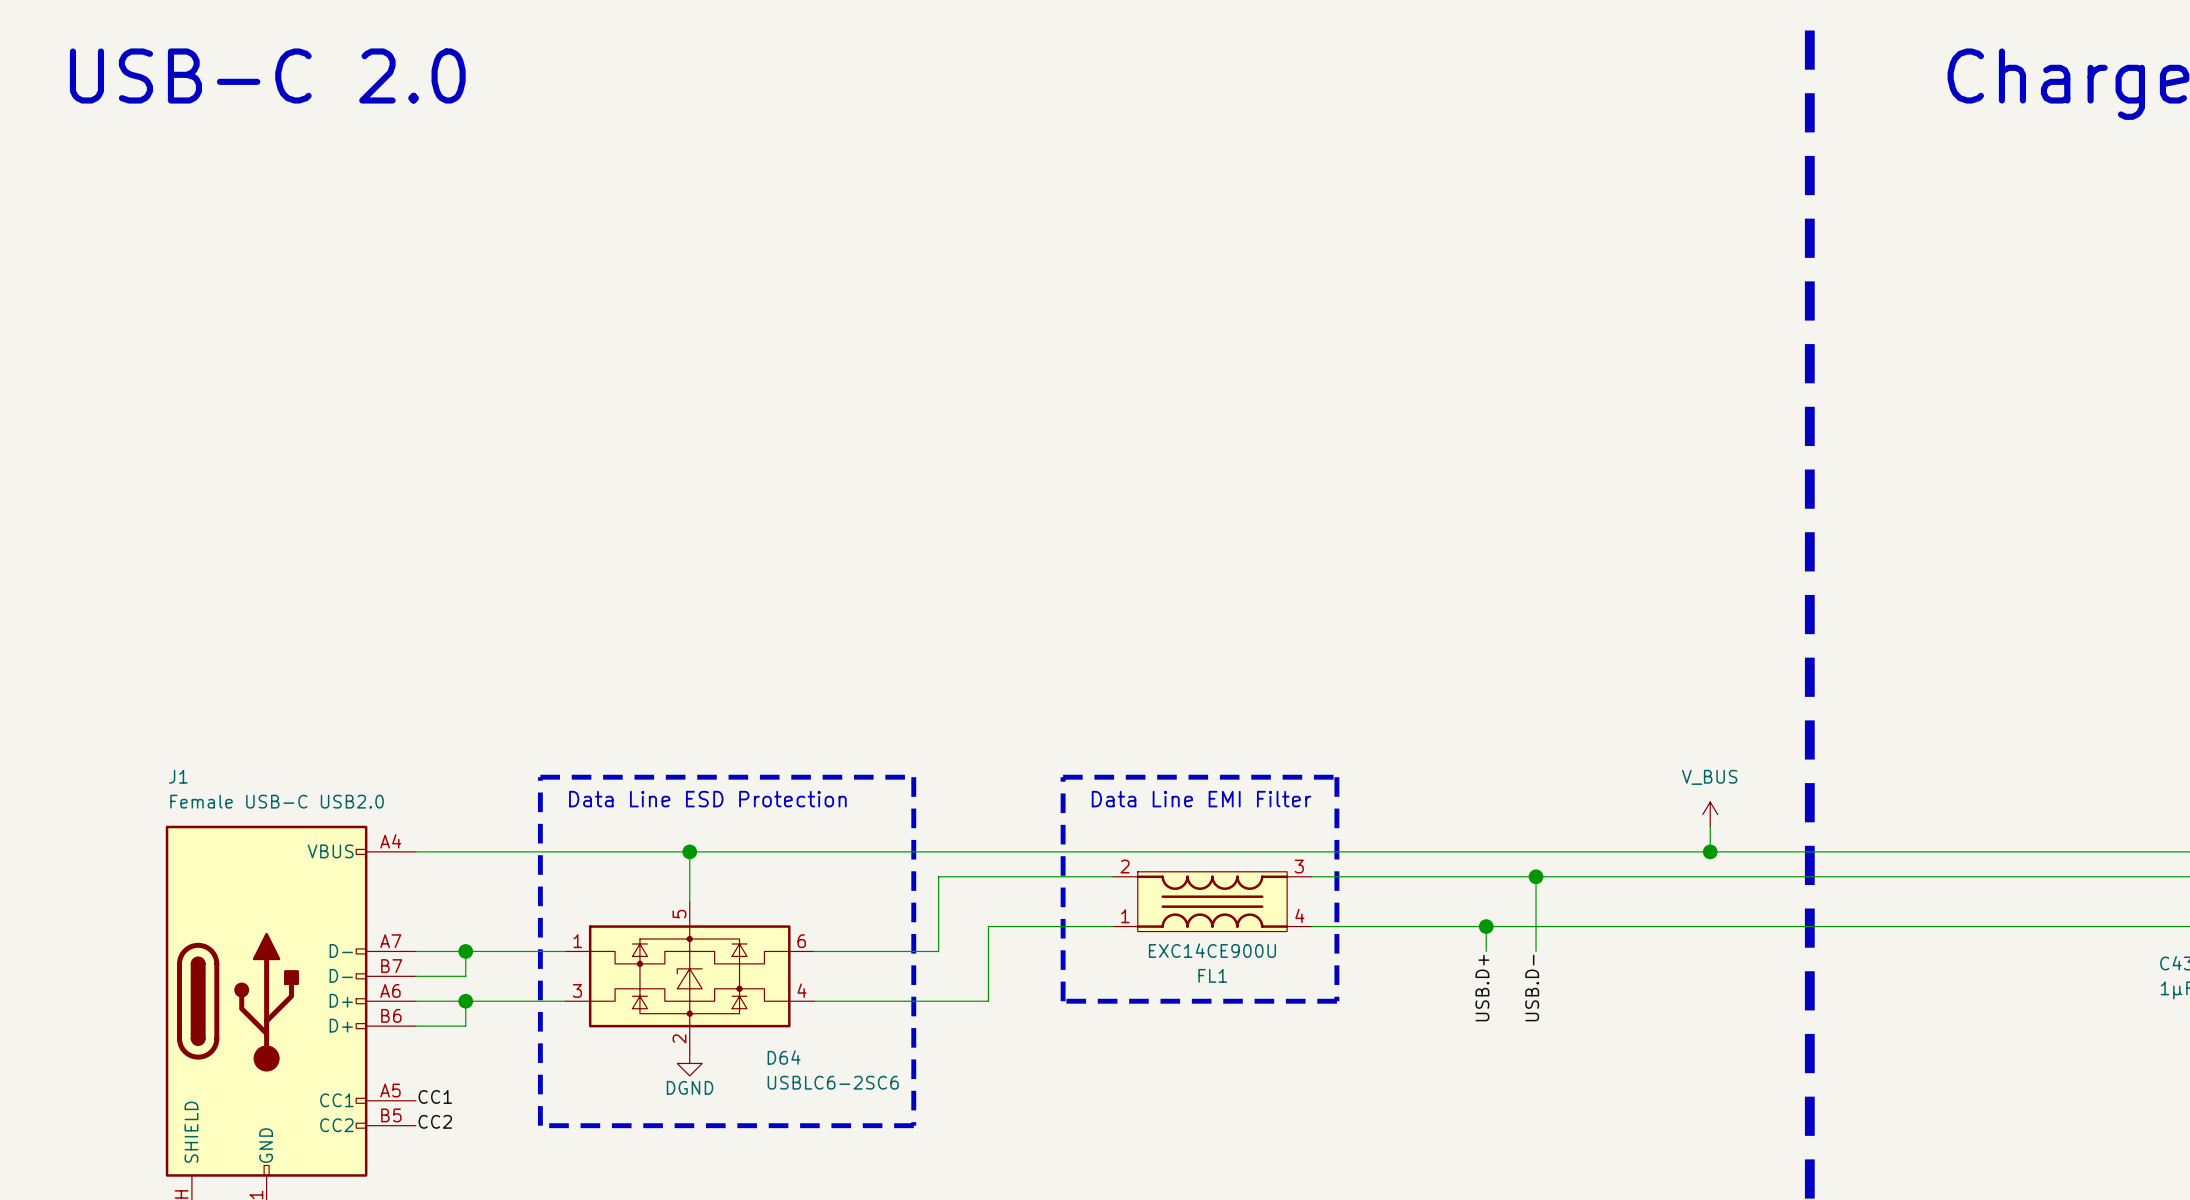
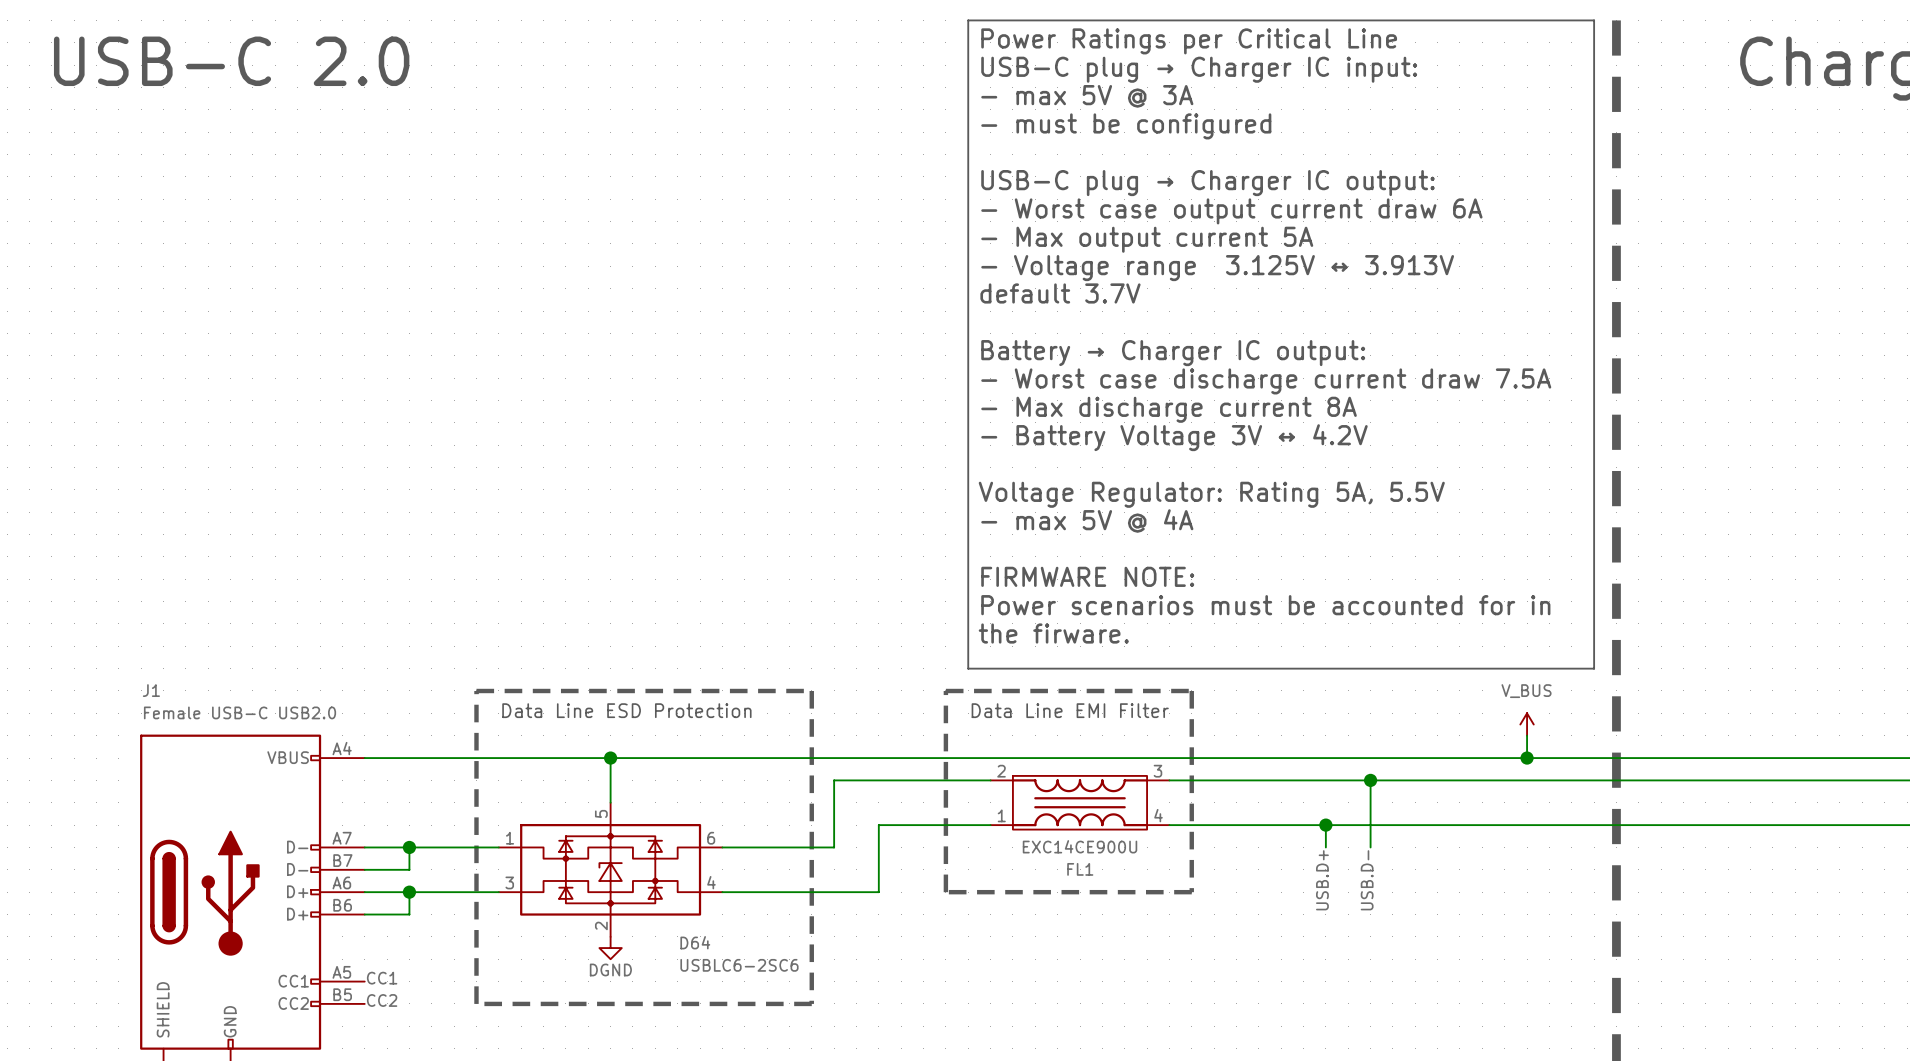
line: none -> (968, 20) (1594, 20) (1594, 668) (968, 668) (968, 20)
text: none -> Power Ratings per Critical Line (1189, 41)
text: none -> USB-C plug → Charger IC input: (1199, 69)
text: none -> - max 5V @ 3A (1087, 96)
text: none -> - must be configured (1126, 126)
text: none -> USB-C plug → Charger IC output: (1208, 183)
text: none -> - Worst case output current draw 6A (1231, 211)
text: none -> - Max output current 5A (1147, 239)
text: none -> - Voltage range 3.125V ↔ 3.913V (1217, 268)
text: none -> default 3.7V (1060, 293)
text: none -> Battery → Charger IC output: (1173, 353)
text: none -> - Worst case discharge current draw 7.5A (1266, 381)
text: none -> - Max discharge current 8A (1169, 409)
text: none -> - Battery Voltage 3V ↔ 4.2V (1174, 437)
text: none -> Voltage Regulator: Rating 5A, 5.5V (1211, 494)
text: none -> - max 5V @ 4A (1087, 521)
text: none -> FIRMWARE NOTE: (1087, 576)
text: none -> Power scenarios must be accounted for in (1265, 605)
text: none -> the firware. (1053, 633)

